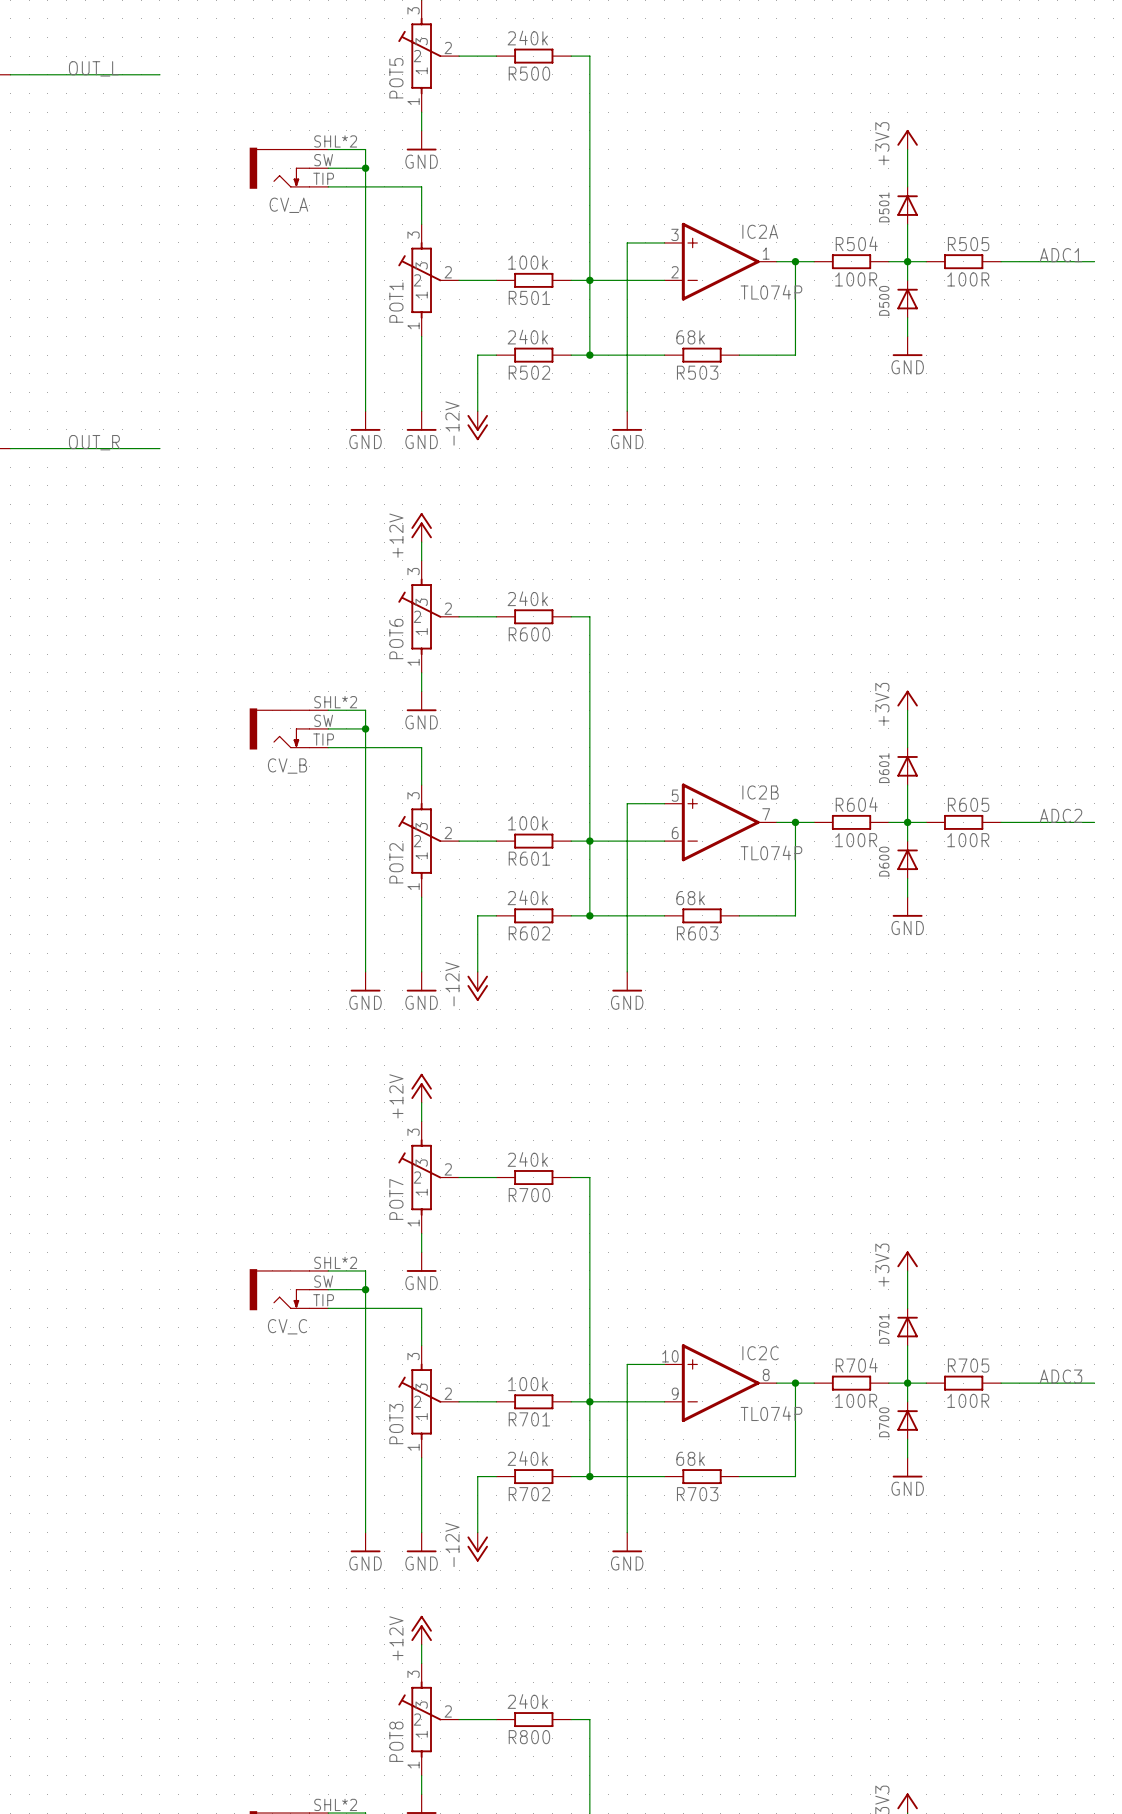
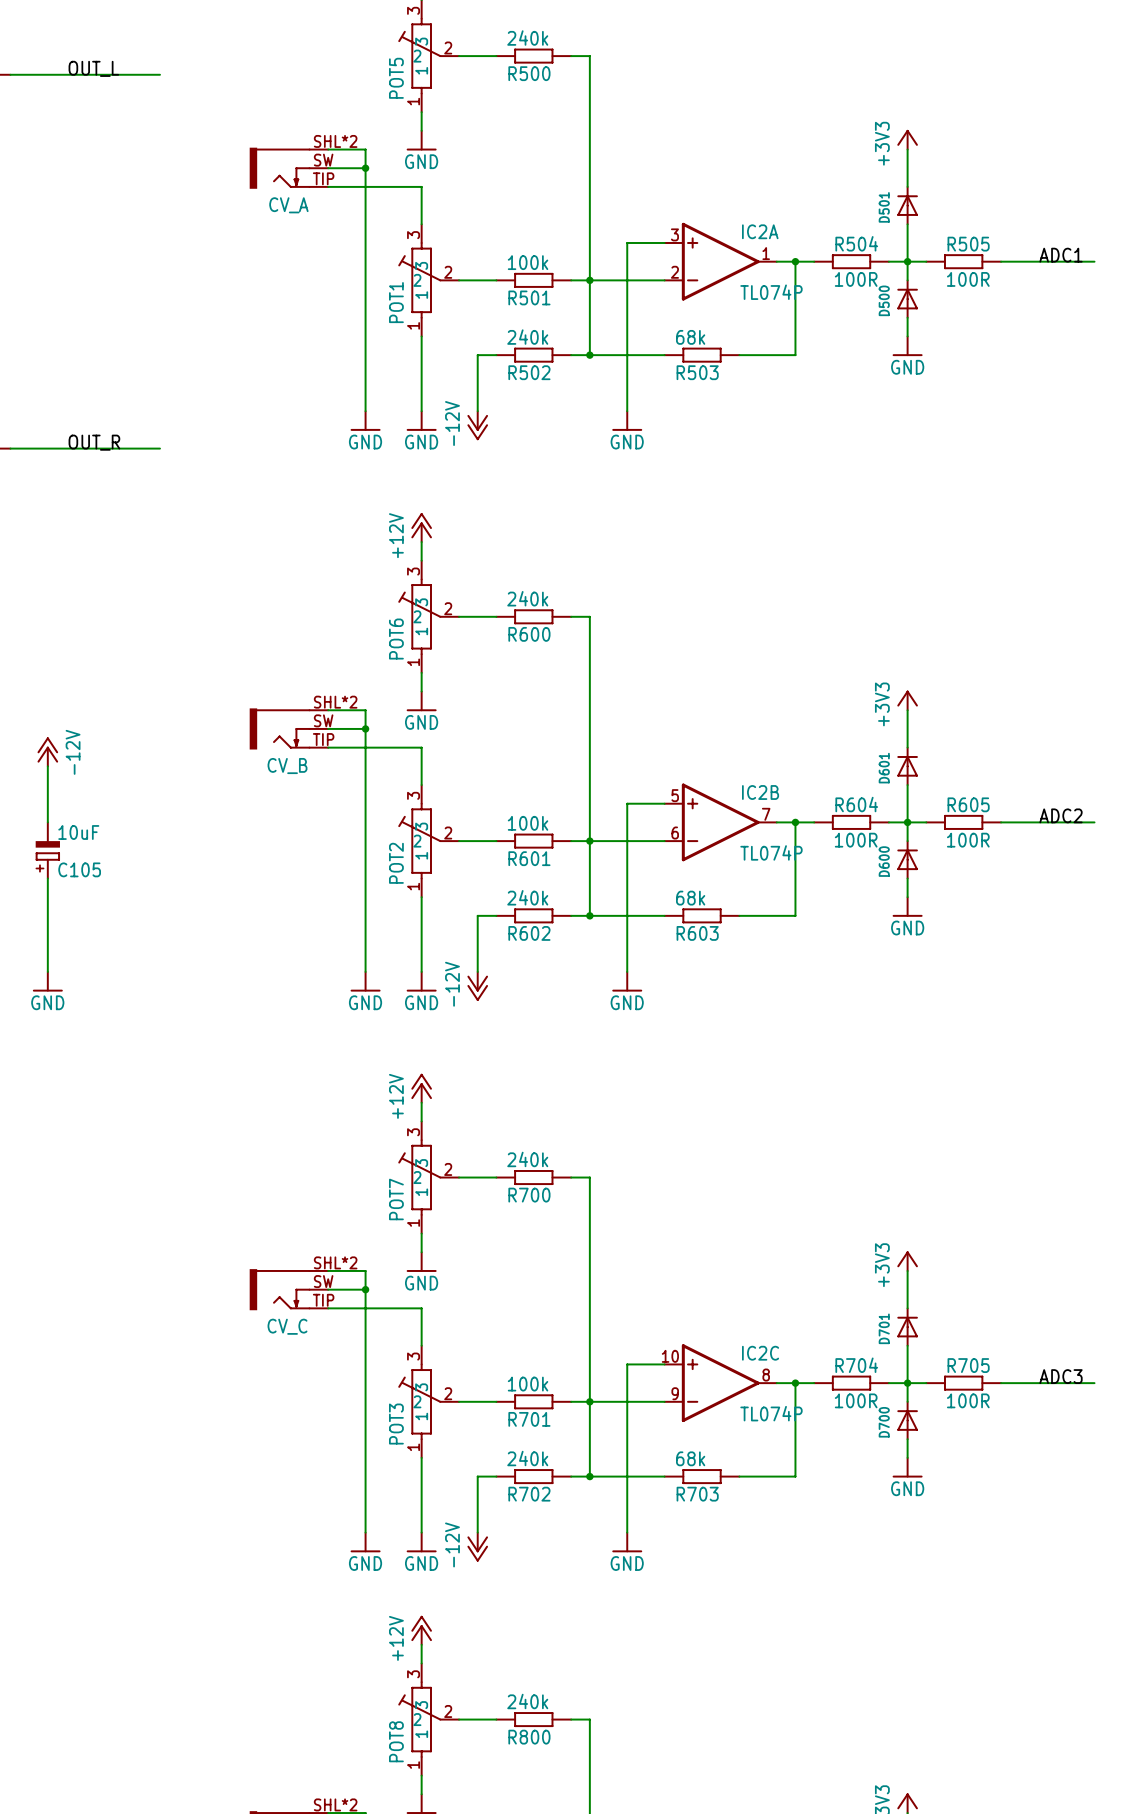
power symbol: none -> -12V (47, 751)
wire: none -> (47, 766) (47, 822)
C105: none -> 10uF (47, 850)
wire: none -> (47, 878) (47, 971)
power symbol: none -> GND (47, 981)

